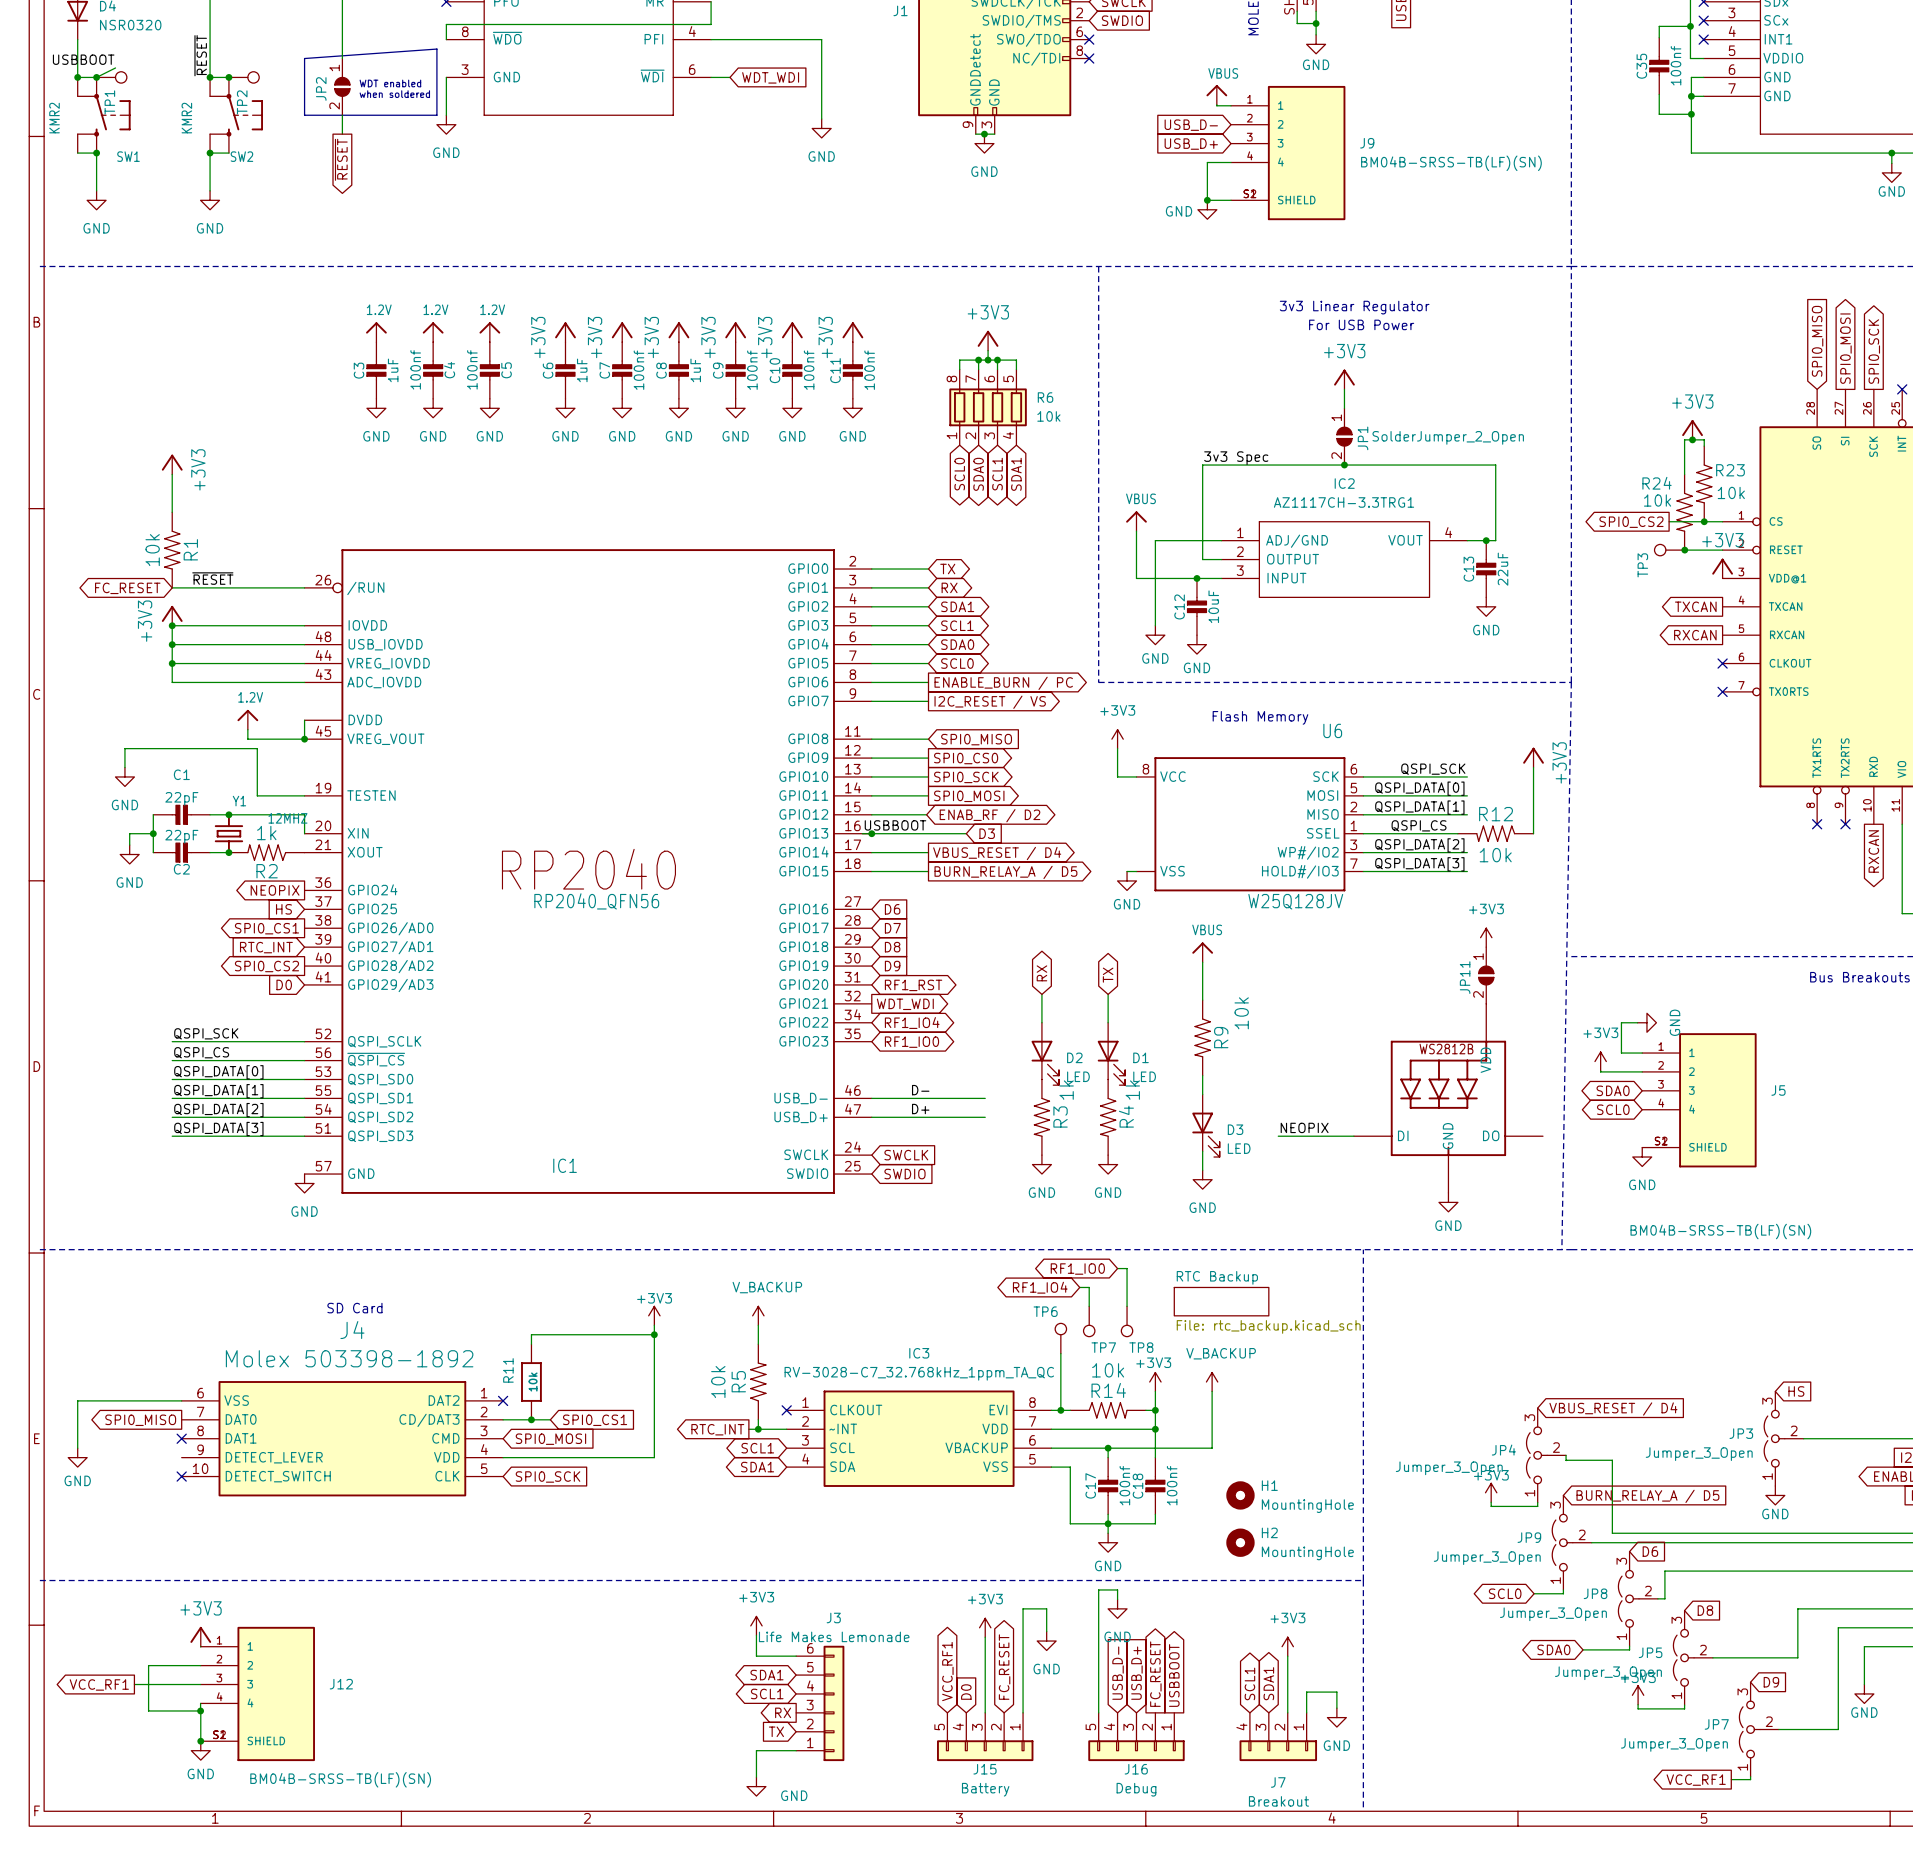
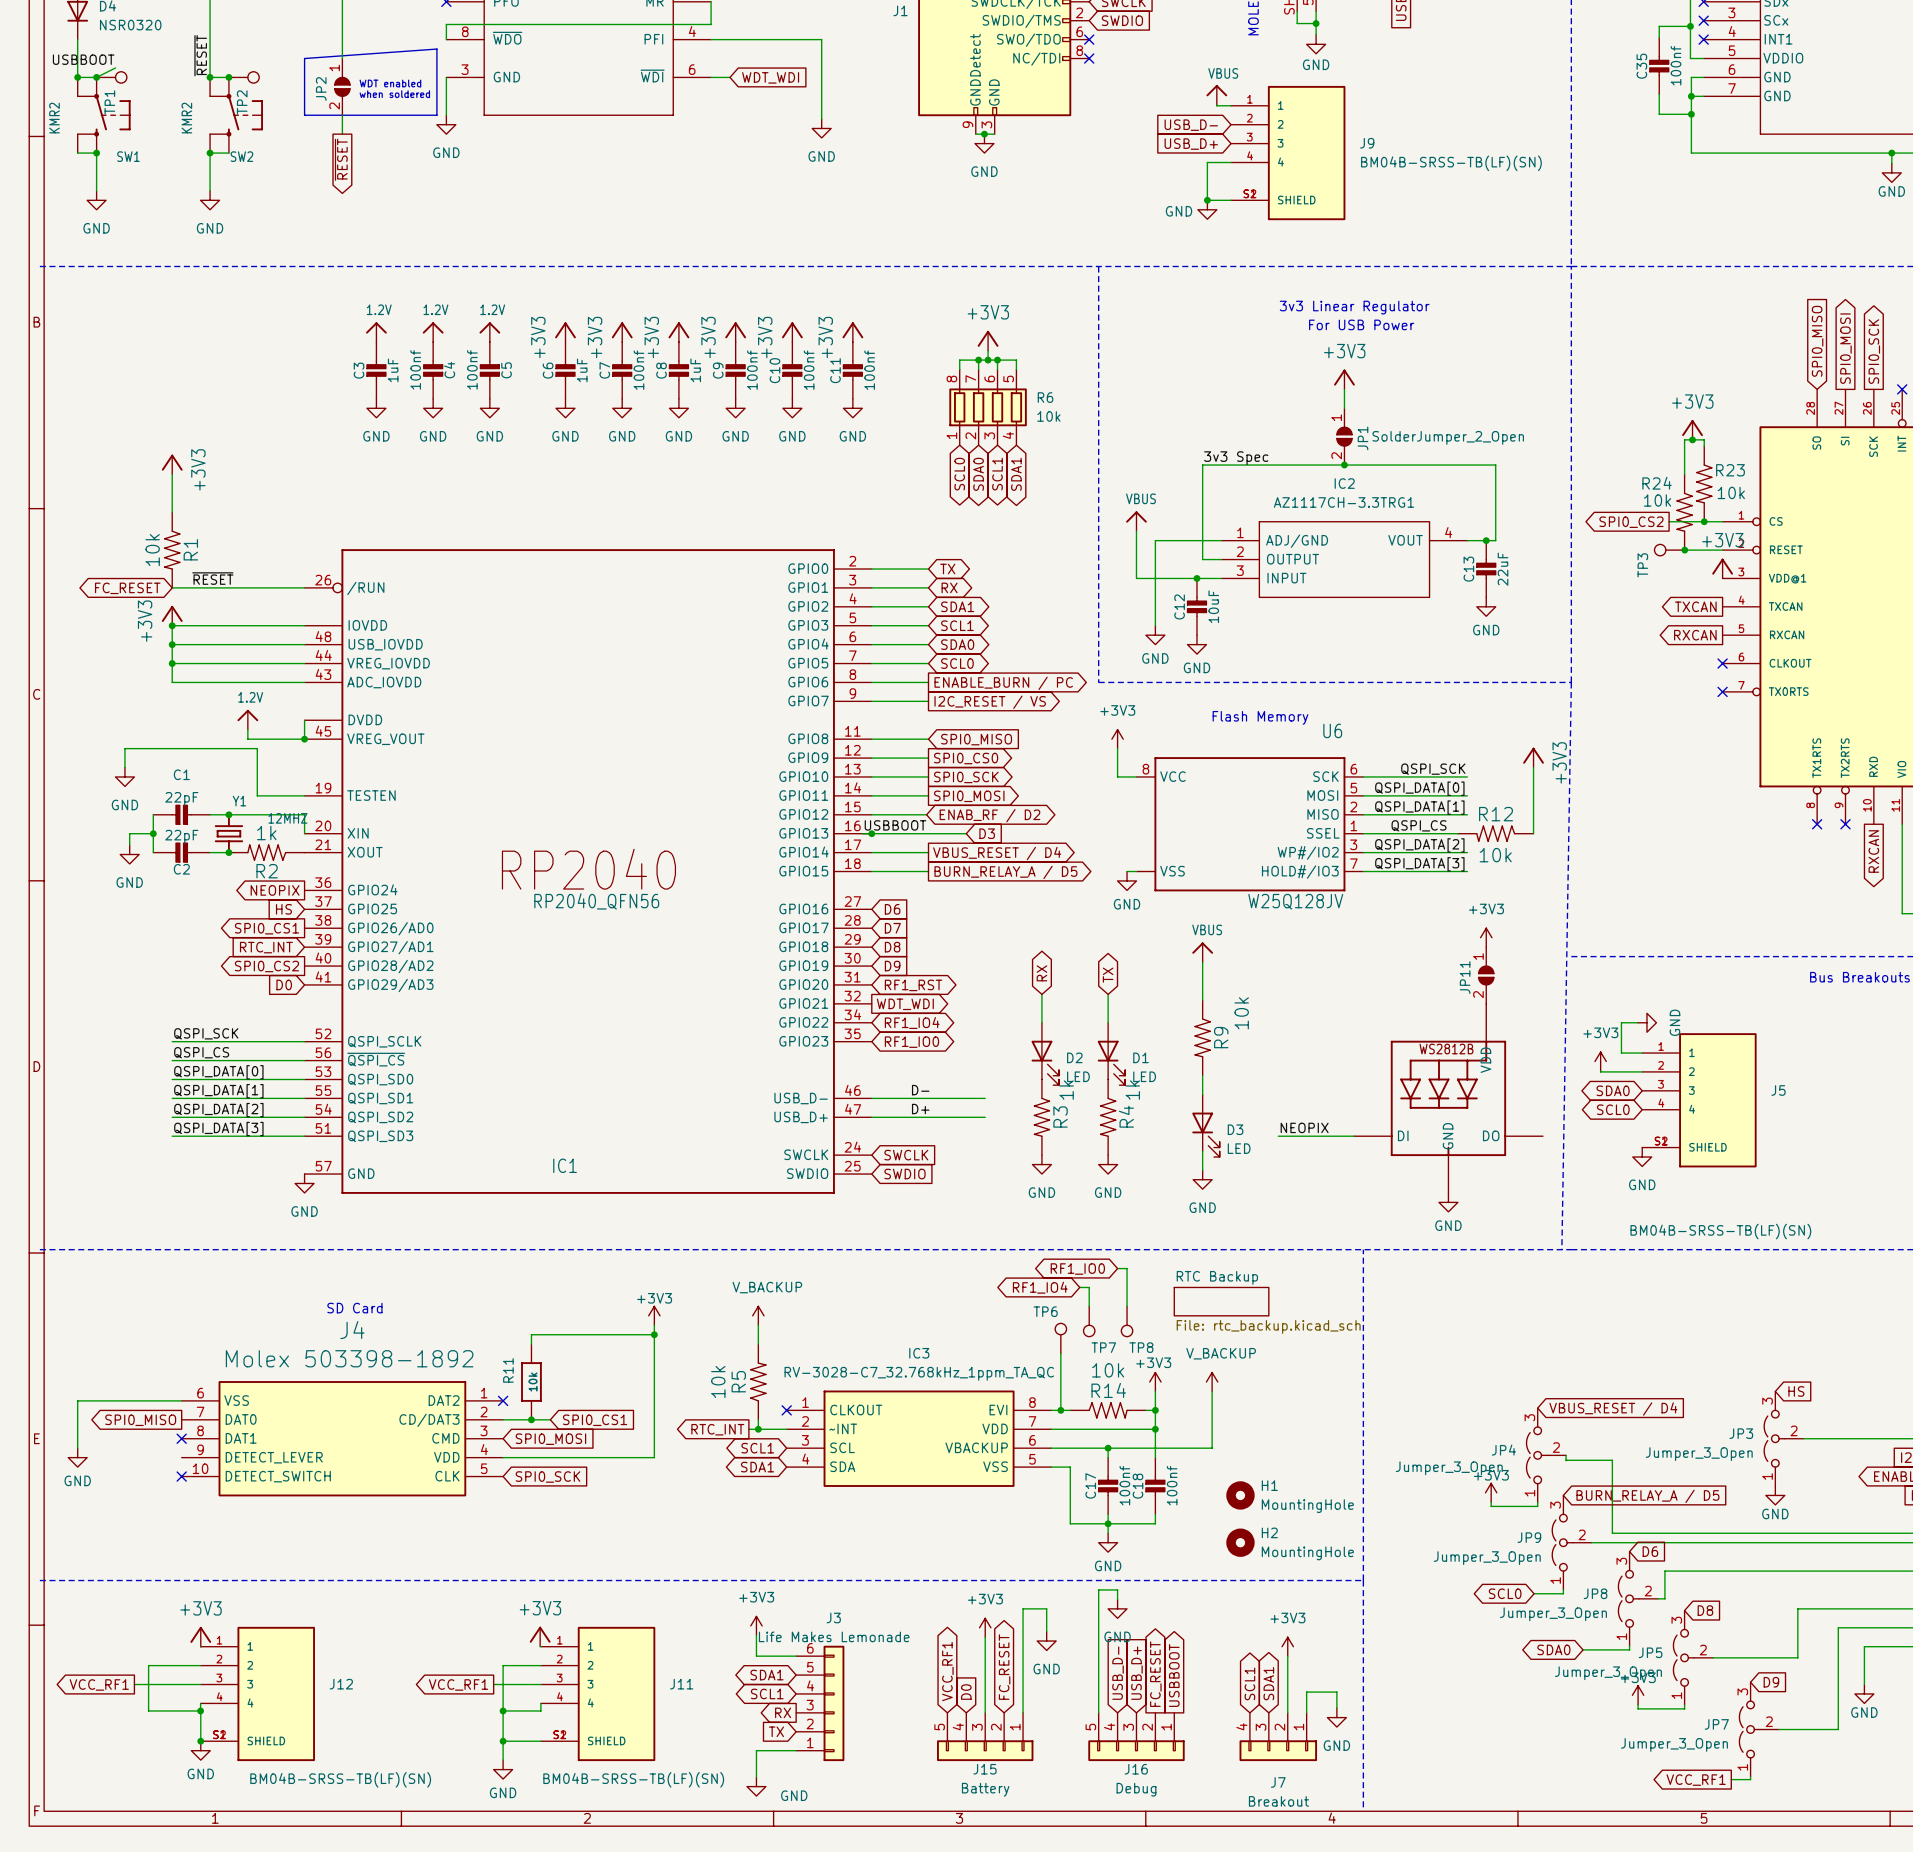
power symbol: none -> +3V3 (540, 1636)
wire: none -> (540, 1646) (540, 1646)
wire: none -> (540, 1665) (503, 1665) (503, 1760)
global label: none -> VCC_RF1 (458, 1684)
wire: none -> (493, 1684) (540, 1684)
J11: none -> BM04B-SRSS-TB(LF)(SN) (598, 1693)
wire: none -> (540, 1703) (540, 1710) (503, 1710)
junction: none -> (503, 1710)
wire: none -> (503, 1741) (540, 1741)
junction: none -> (503, 1741)
power symbol: none -> GND (503, 1769)

